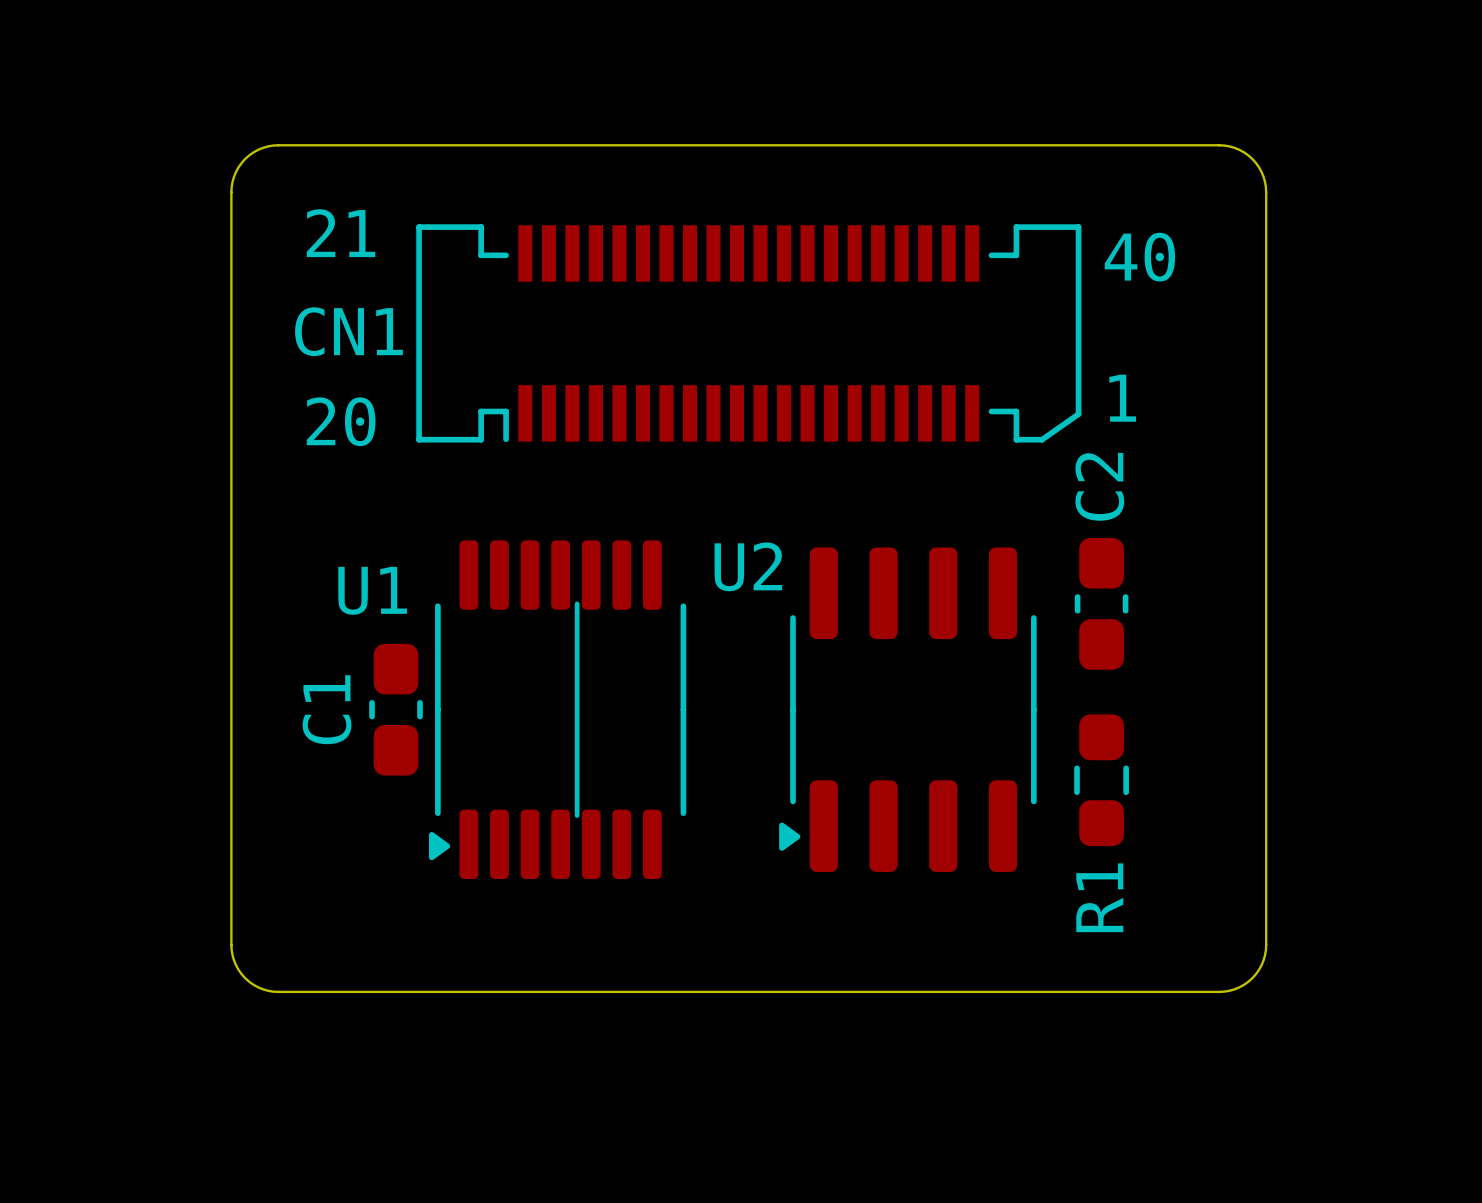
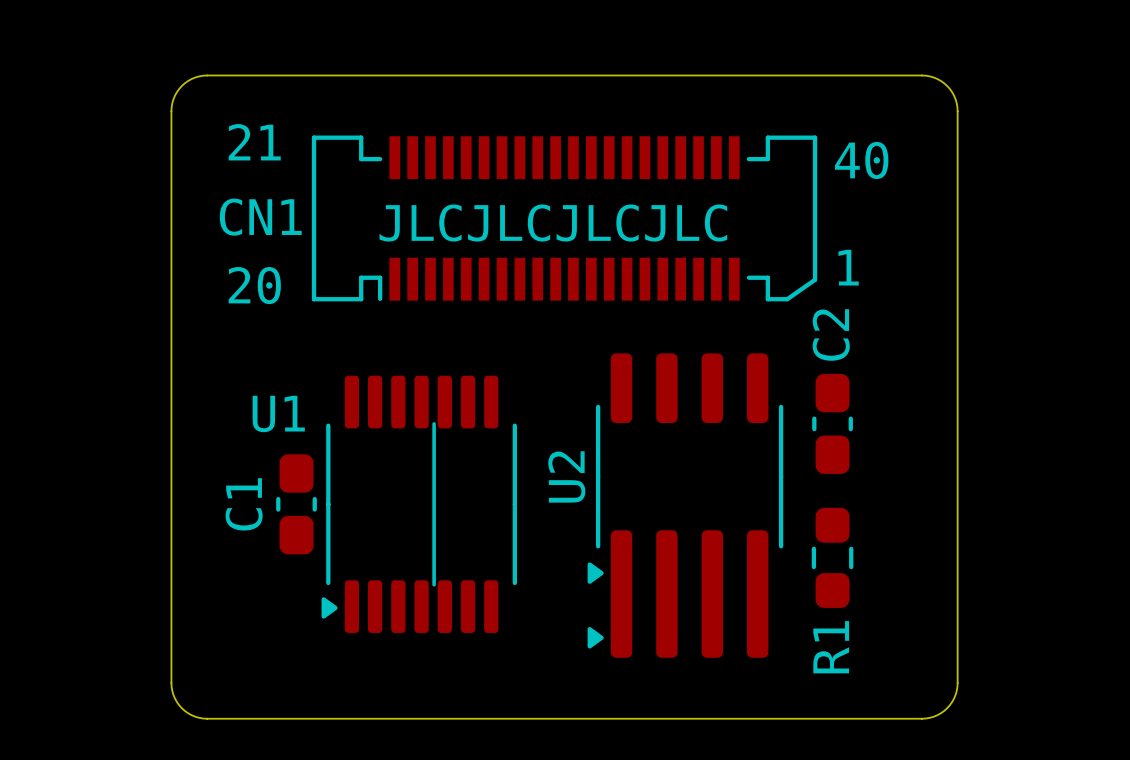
text: none -> JLCJLCJLCJLC (553, 223)
U2 footprint: [779, 547, 1037, 872] -> [587, 353, 784, 658]
U2 name position: U2 (748, 566) -> U2 (566, 476)

